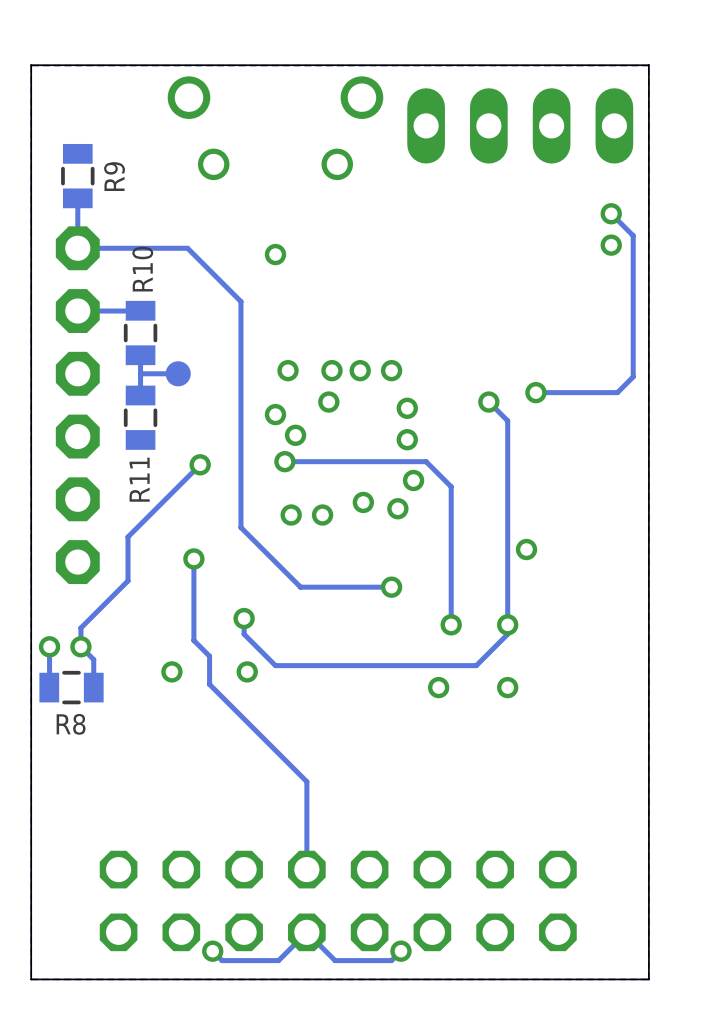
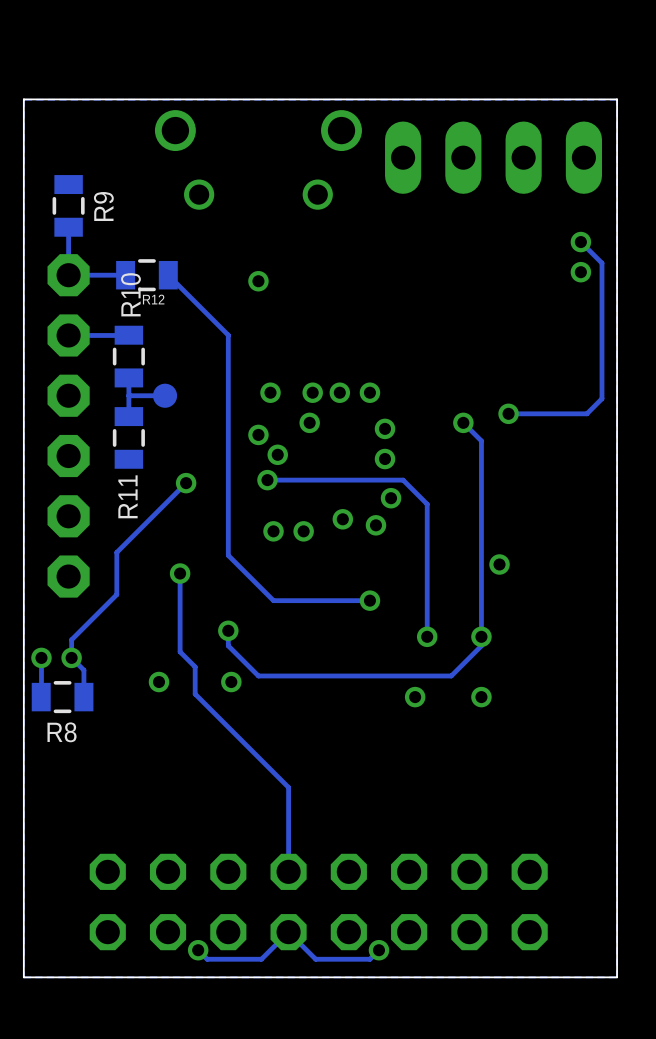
track: (137, 248) (187, 248) (240, 301) (240, 527) (300, 587) -> (168, 275) (228, 335) (228, 555) (273, 600) (282, 600)
R12: none -> (146, 275)

